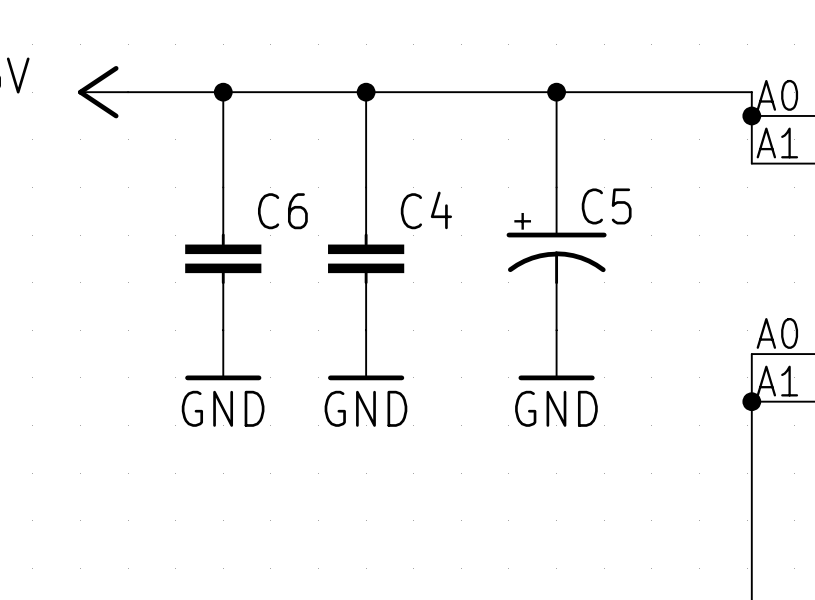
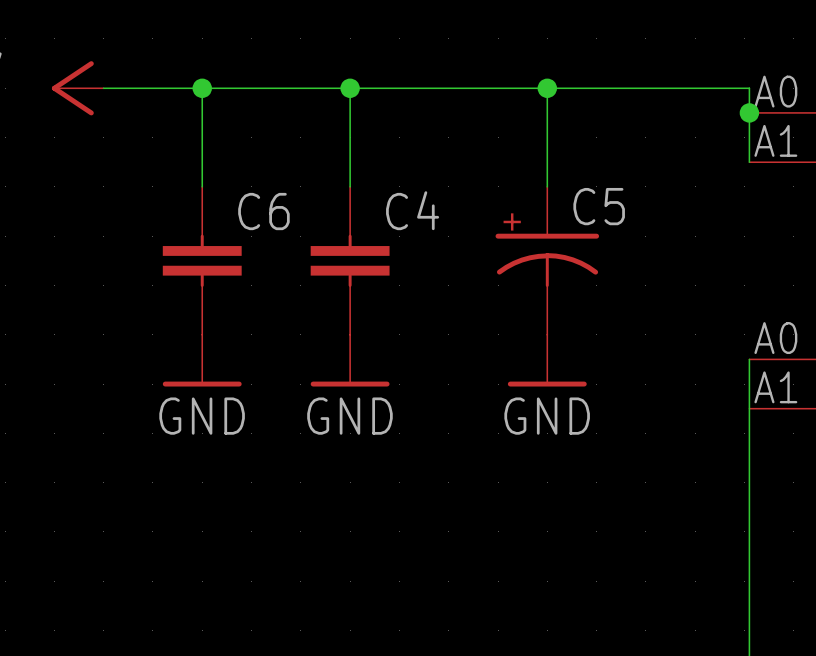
junction: (751, 401) -> none

